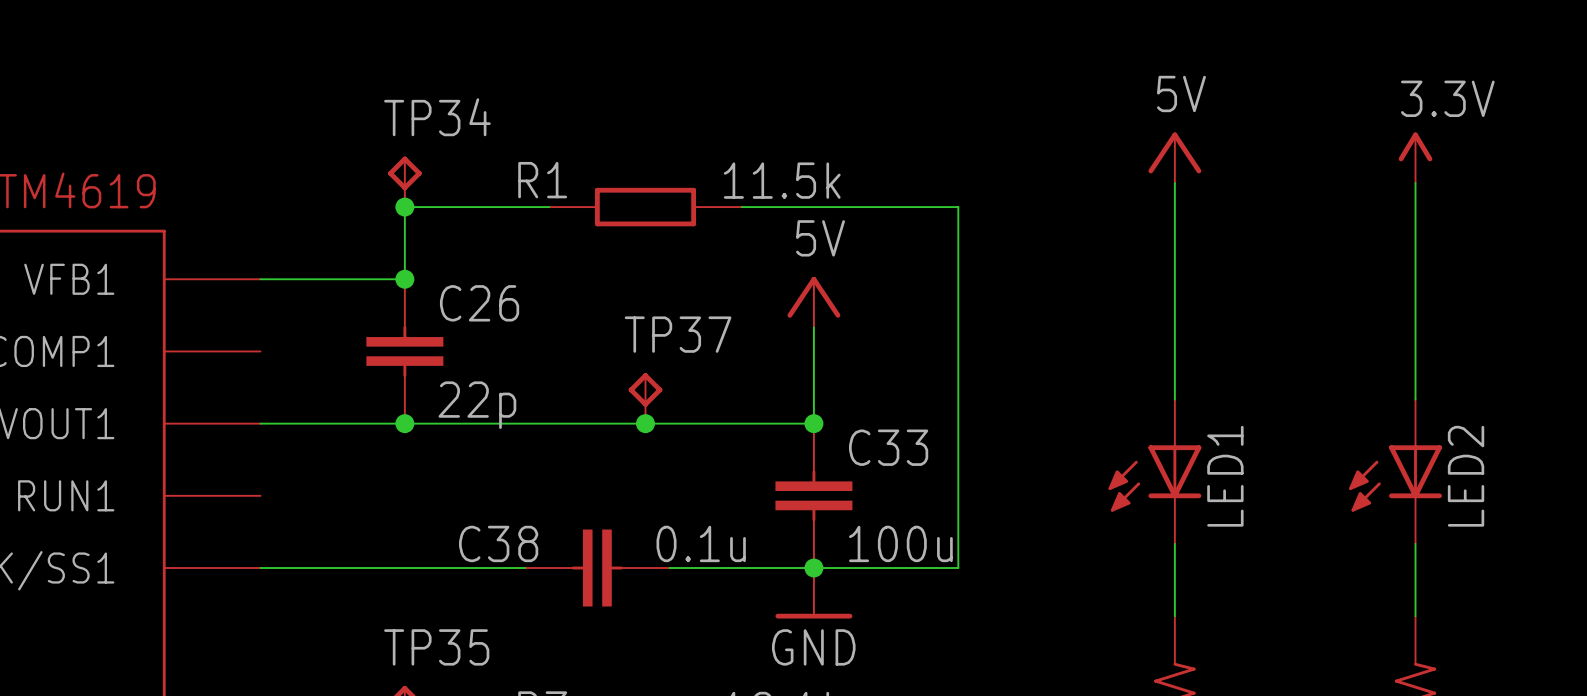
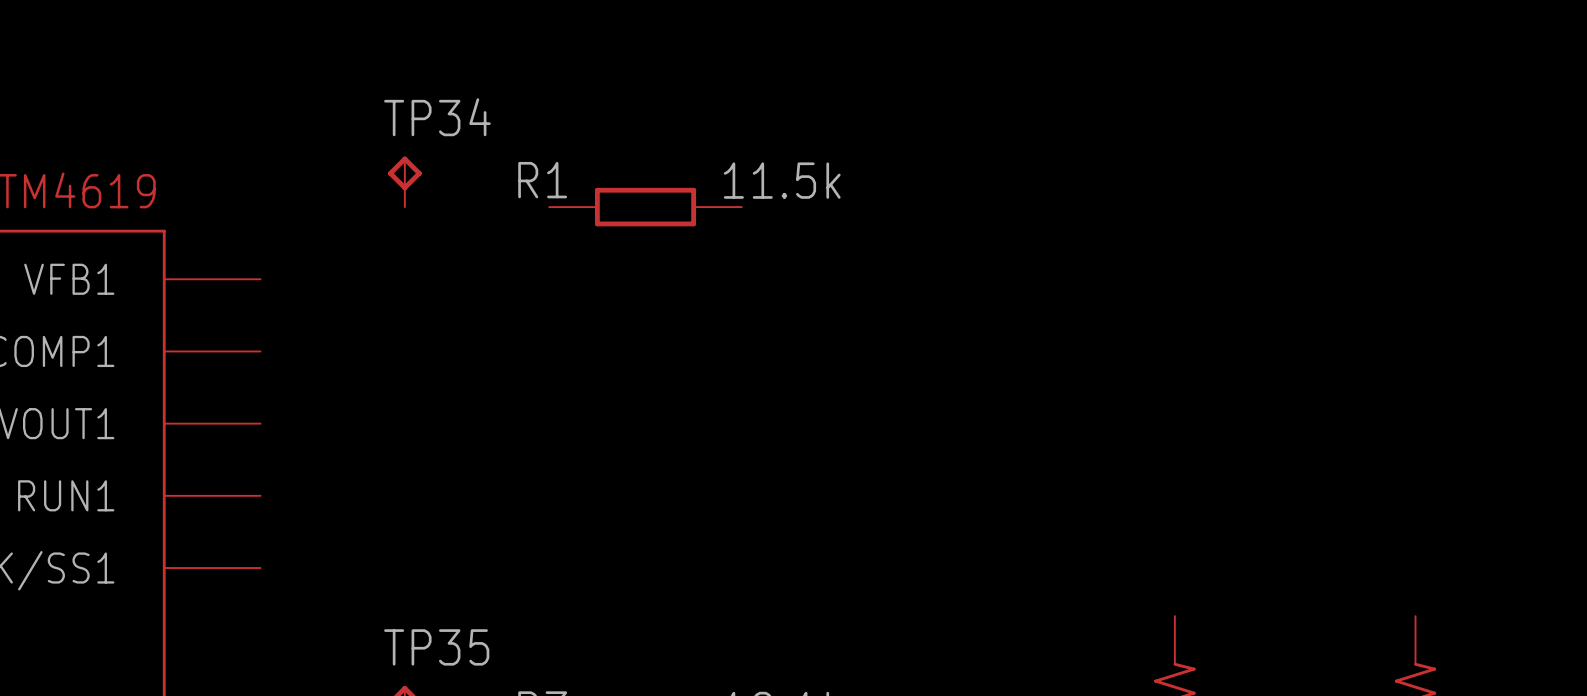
power symbol: 5V (1174, 157) -> none
power symbol: 3.3V (1415, 157) -> none
wire: (1174, 183) (1174, 399) -> none
wire: (1415, 183) (1415, 399) -> none
junction: (404, 207) -> none
wire: (549, 207) (404, 207) (404, 279) (260, 279) -> none
wire: (741, 207) (958, 207) (958, 568) (669, 568) -> none
junction: (404, 279) -> none
power symbol: 5V (813, 302) -> none
wire: (813, 327) (813, 423) (260, 423) -> none
C26: 22p (404, 351) -> none
TP37: (645, 398) -> none
junction: (404, 423) -> none
junction: (645, 423) -> none
junction: (813, 423) -> none
LED1: (1154, 471) -> none
LED2: (1395, 471) -> none
C33: 100u (813, 495) -> none
wire: (1174, 543) (1174, 616) -> none
wire: (1415, 543) (1415, 616) -> none
wire: (260, 568) (525, 568) -> none
C38: 0.1u (597, 568) -> none
junction: (813, 568) -> none
power symbol: GND (813, 593) -> none

